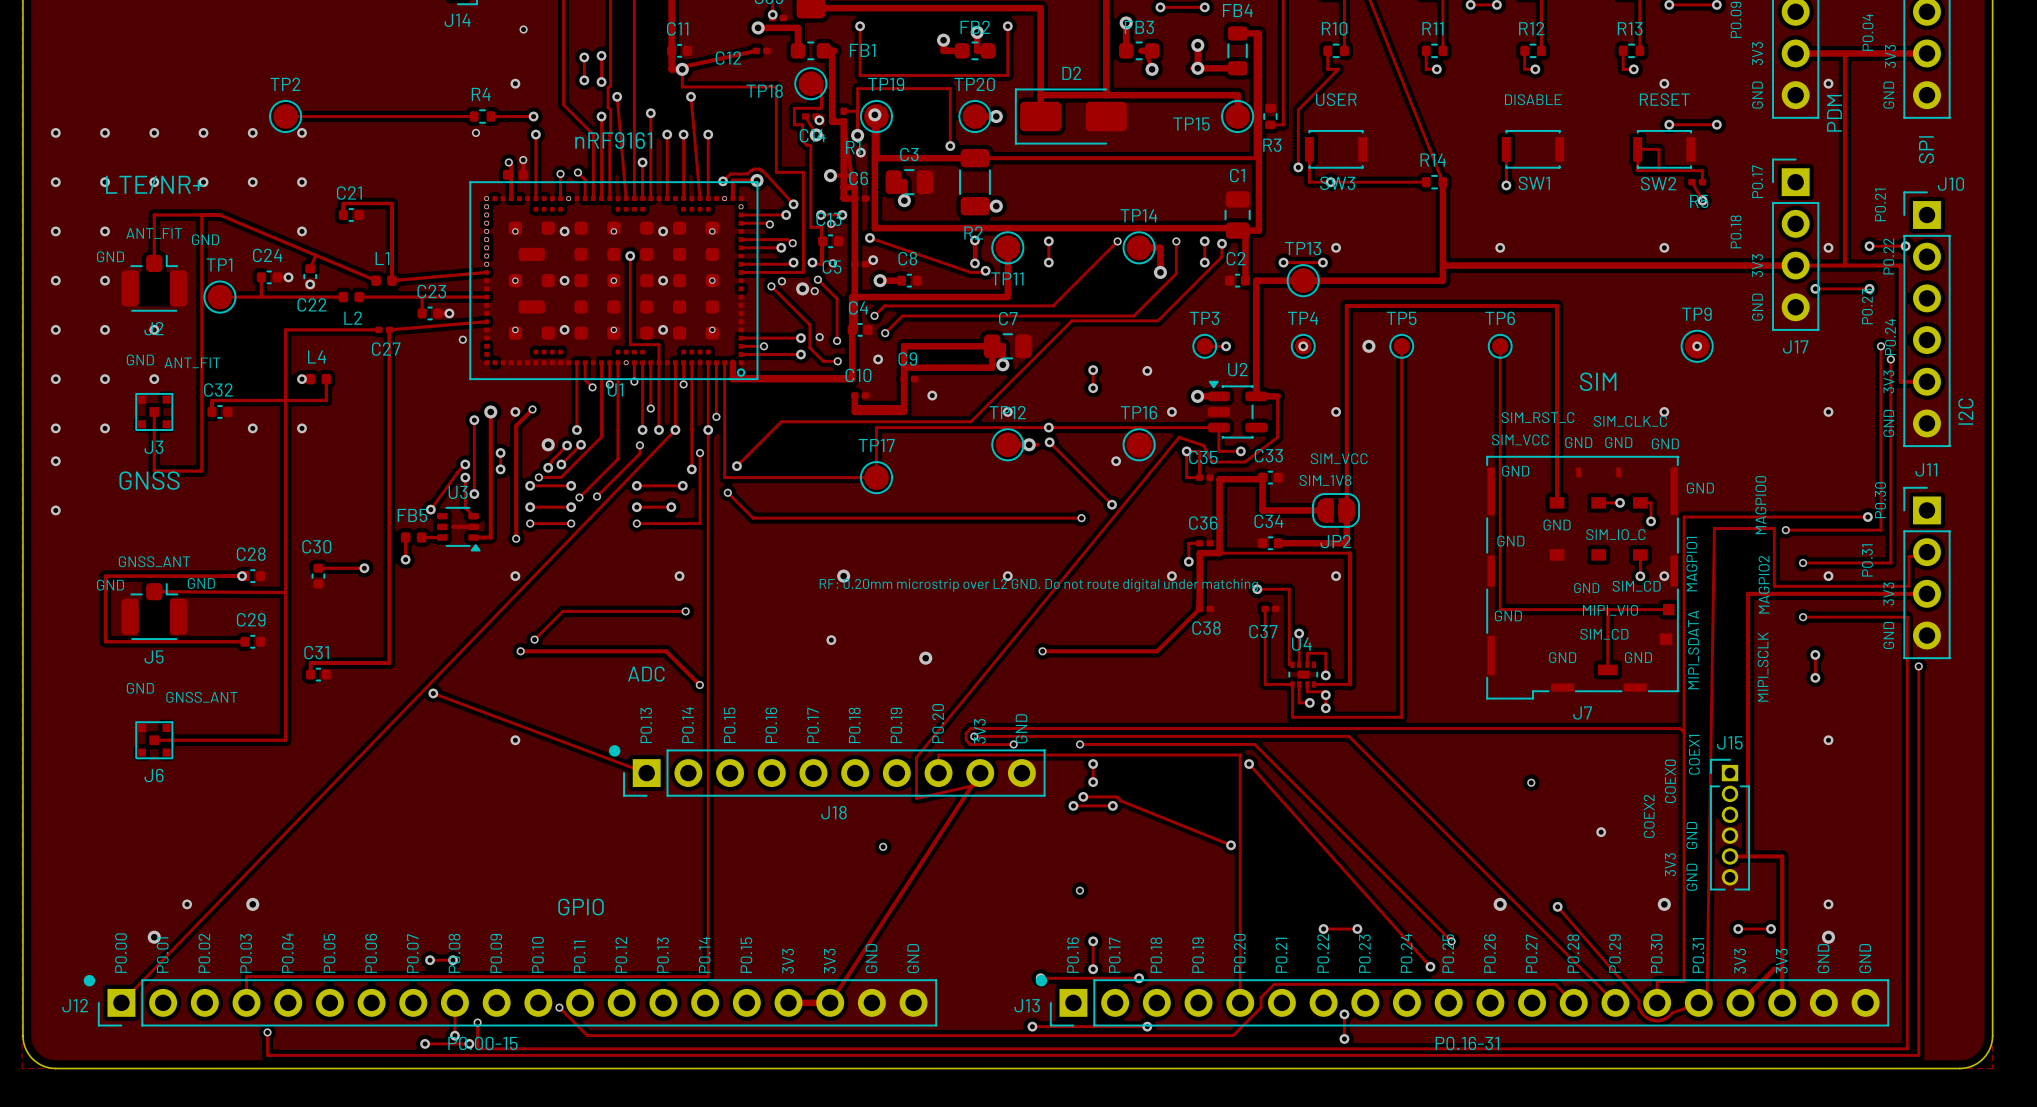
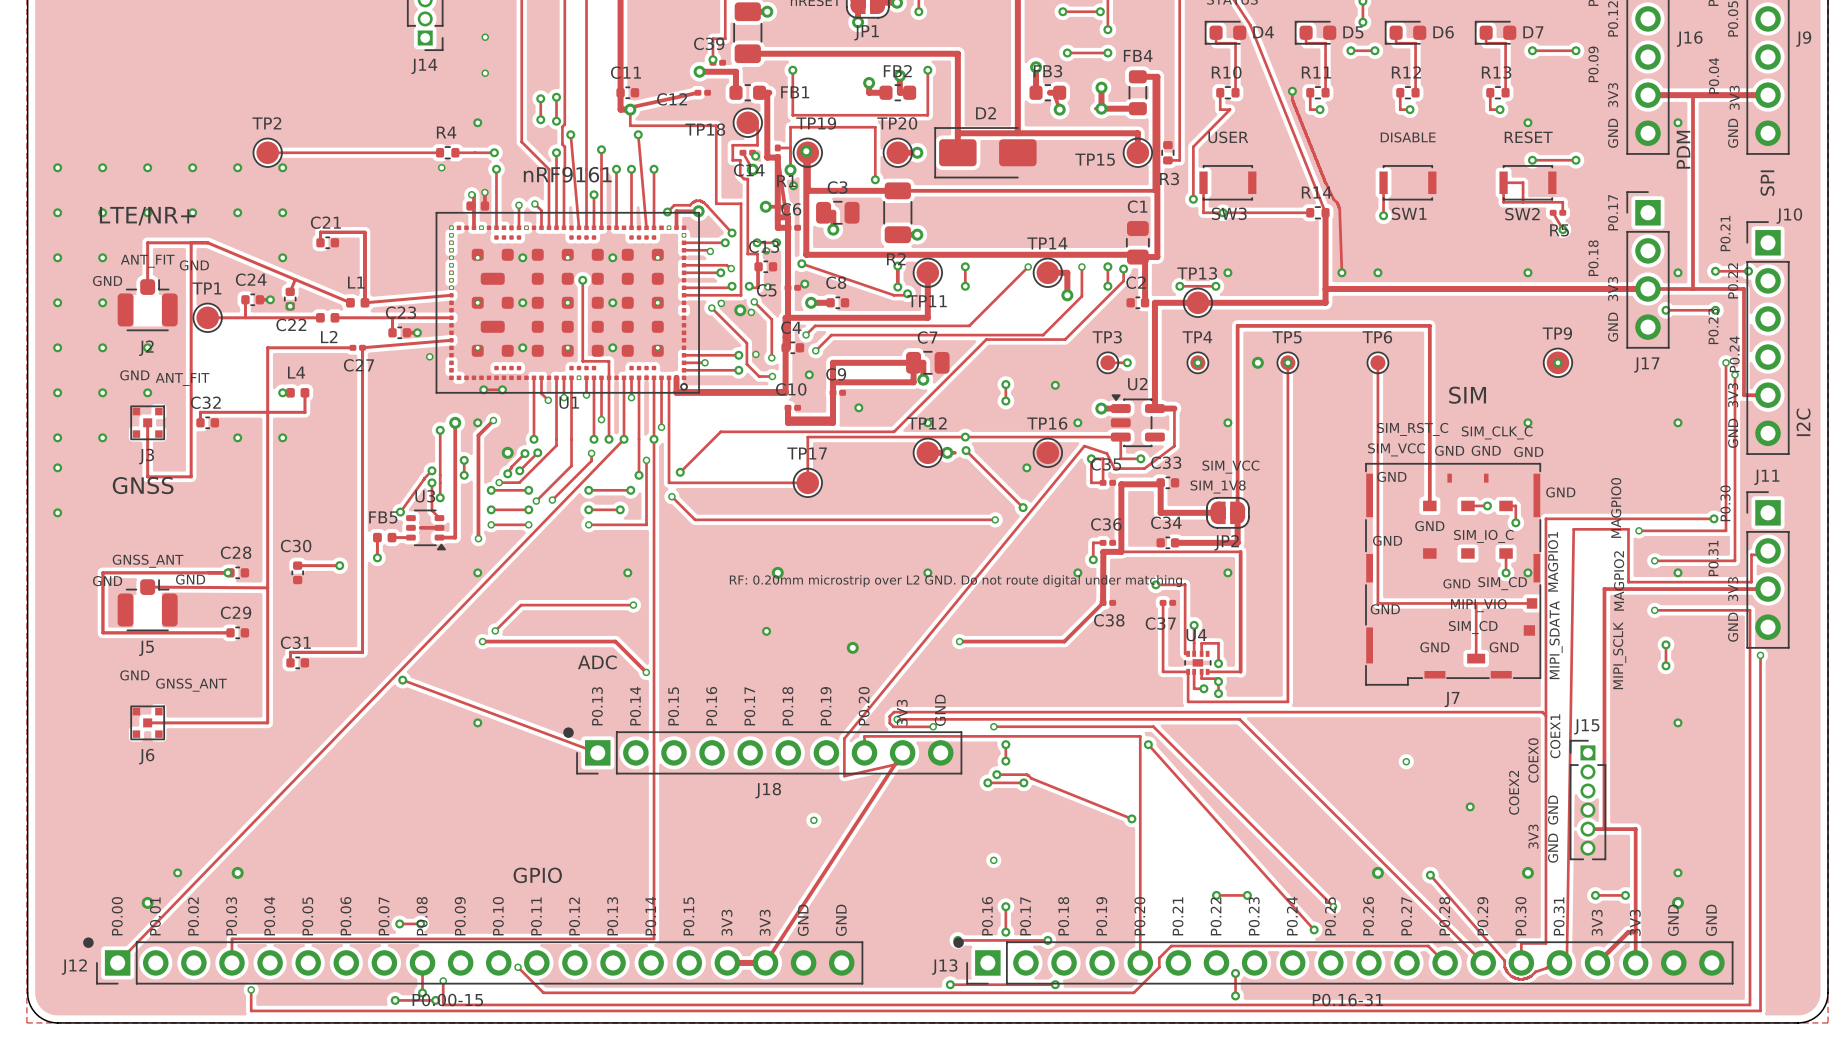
track: none -> (1292, 91) (1293, 102) (1324, 181) (1339, 208) (1341, 272)
via: none -> (1292, 91)
via: none -> (481, 227)
via: none -> (1341, 272)
via: none -> (1287, 362)
track: none -> (483, 389) (502, 389)
via: none -> (483, 389)
via: none -> (502, 389)

